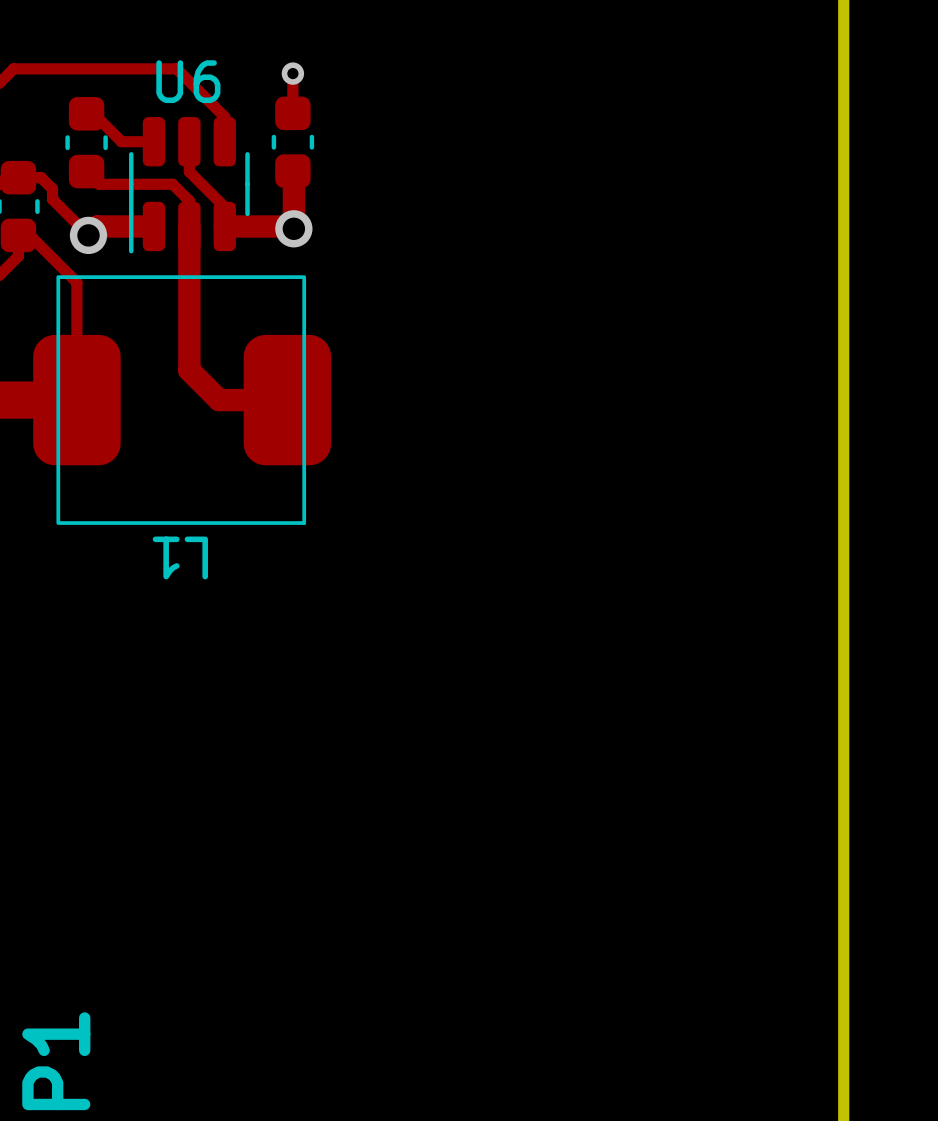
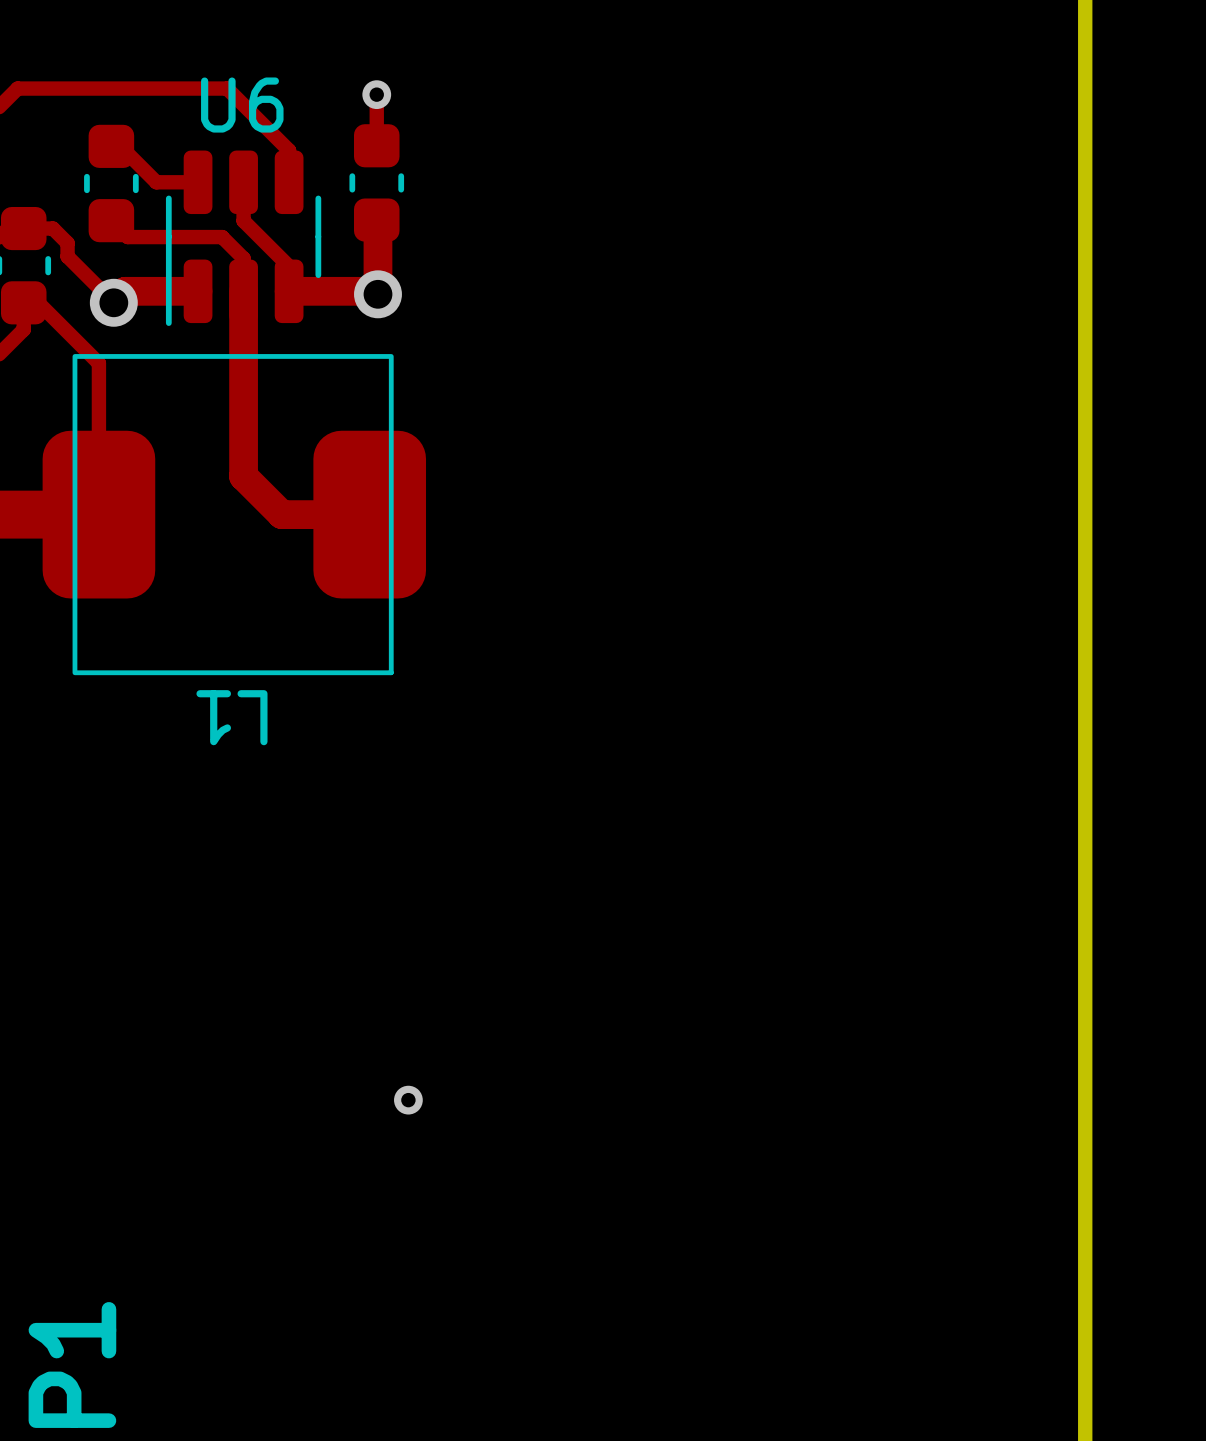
via: none -> (408, 1100)

